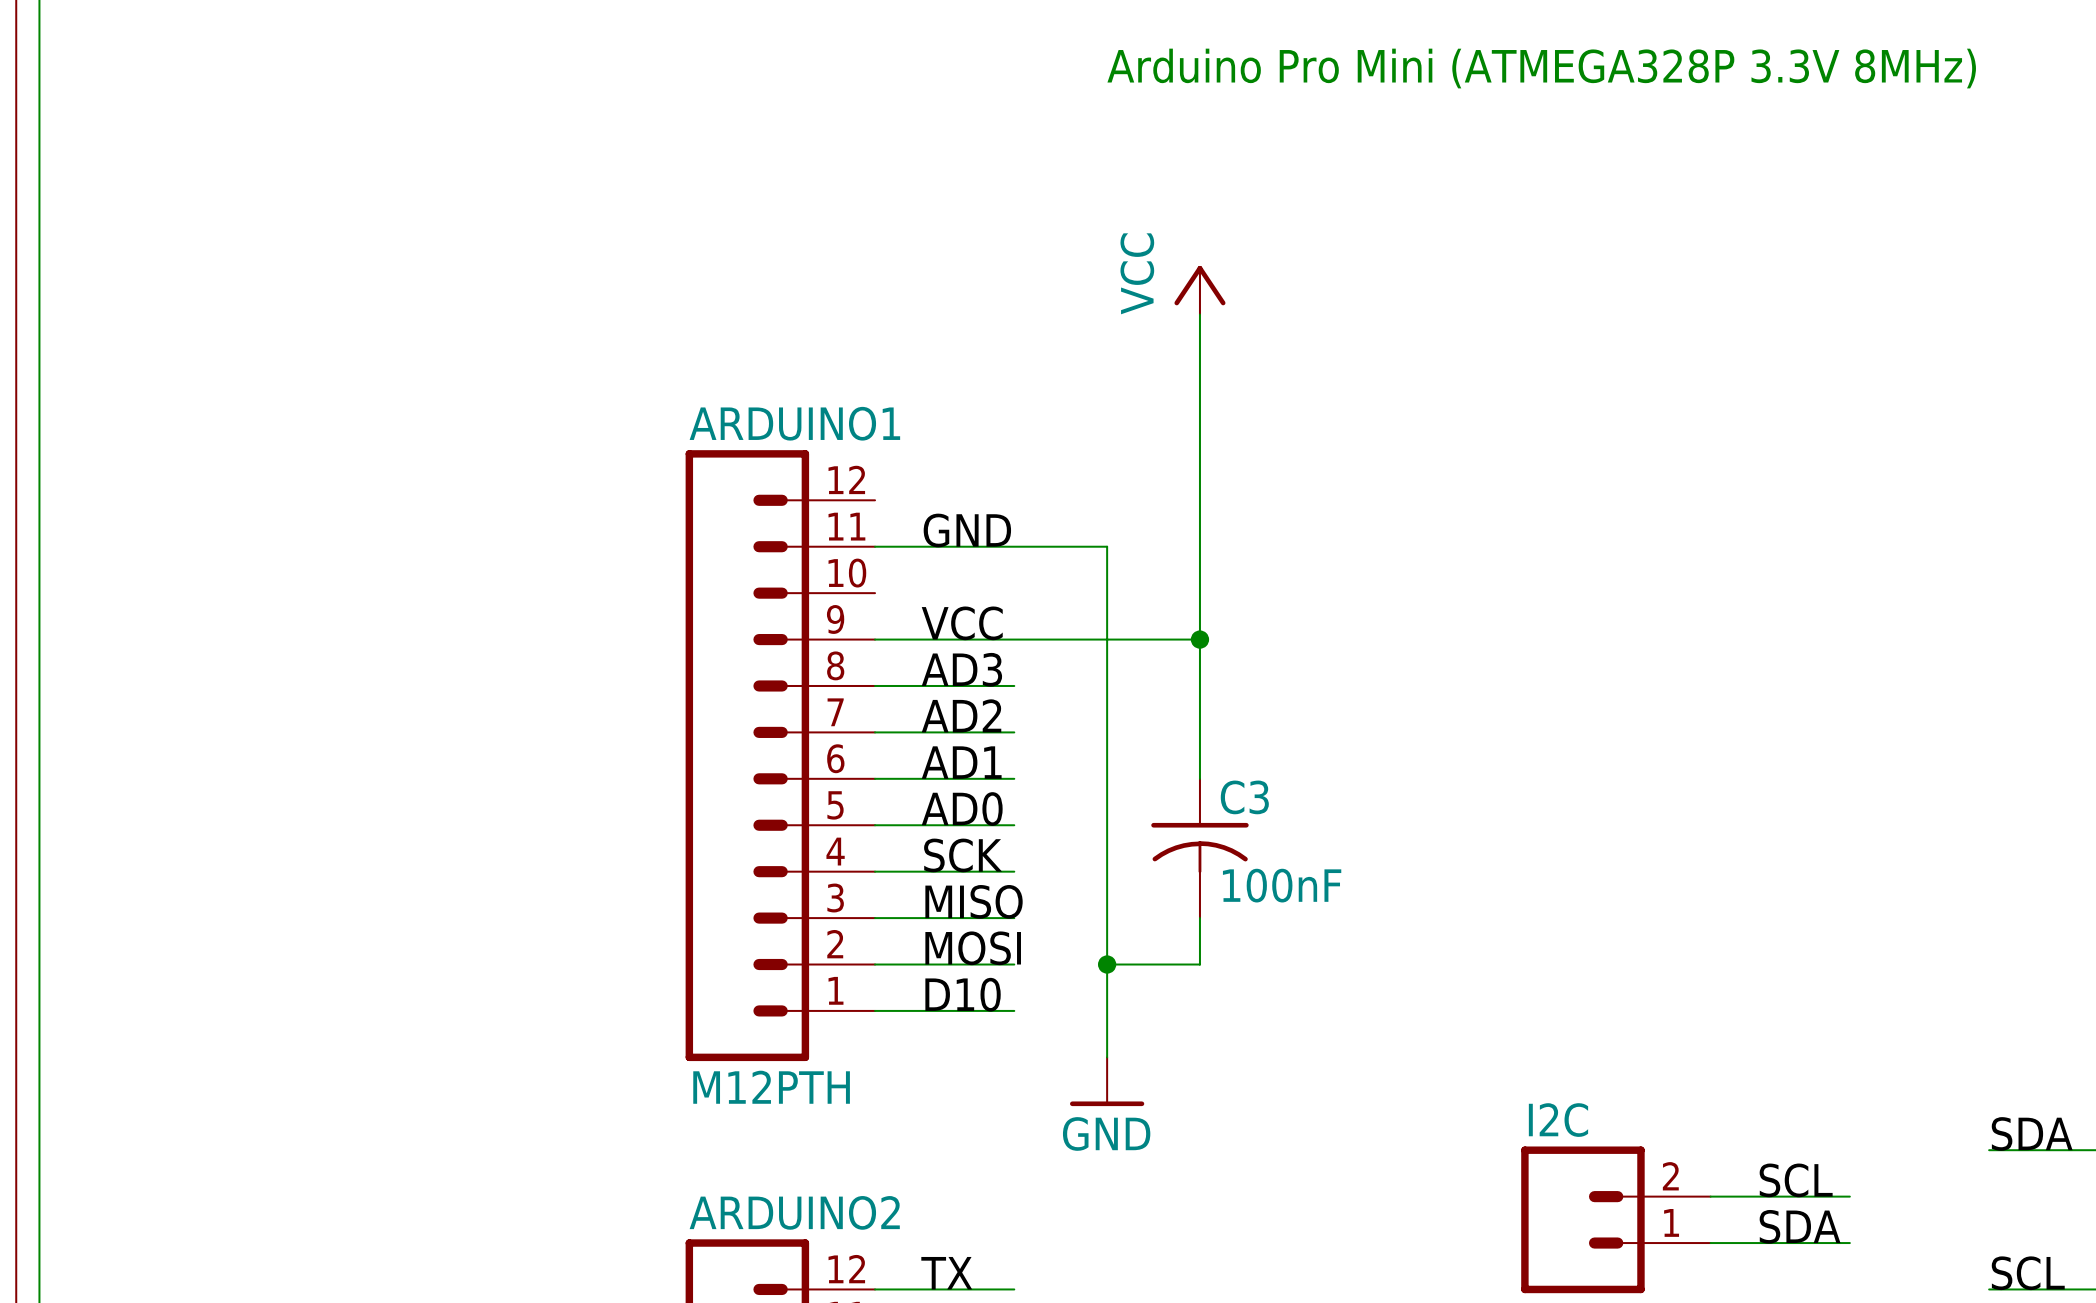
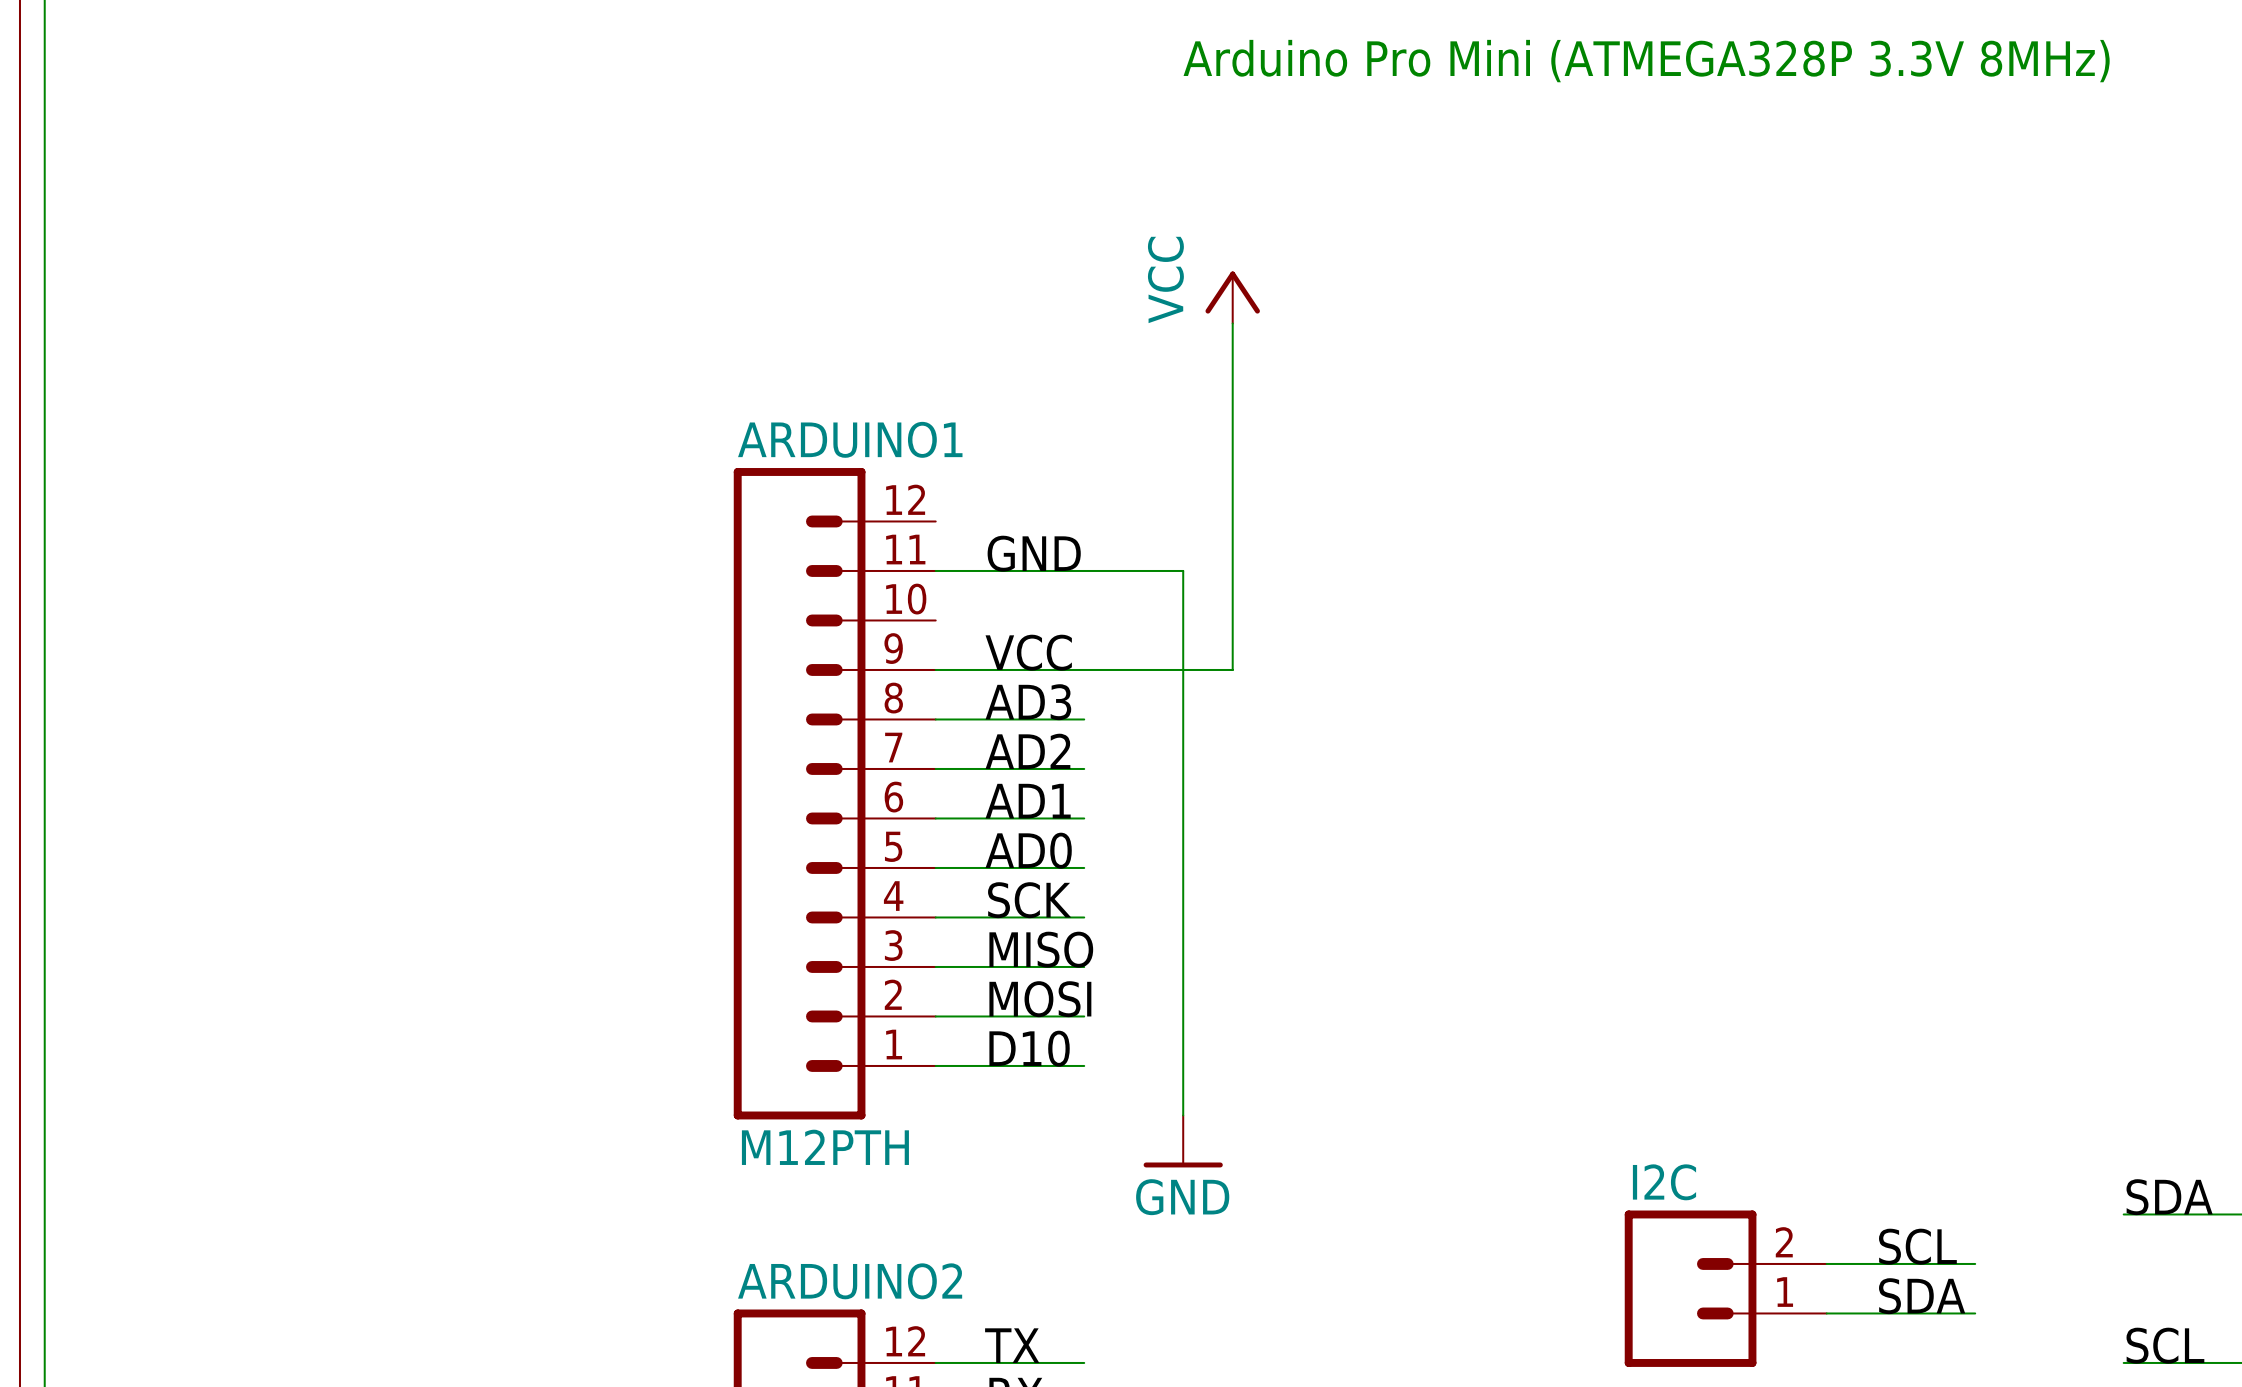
power symbol position: VCC (1199, 290) -> VCC (1232, 297)
wire: (1199, 314) (1199, 778) -> none
wire: (1153, 639) (1199, 639) -> (1232, 669) (1232, 323)
junction: (1199, 639) -> none
C3: 100nF (1199, 848) -> none
wire: (1199, 918) (1199, 964) (1107, 964) -> none
junction: (1107, 964) -> none

